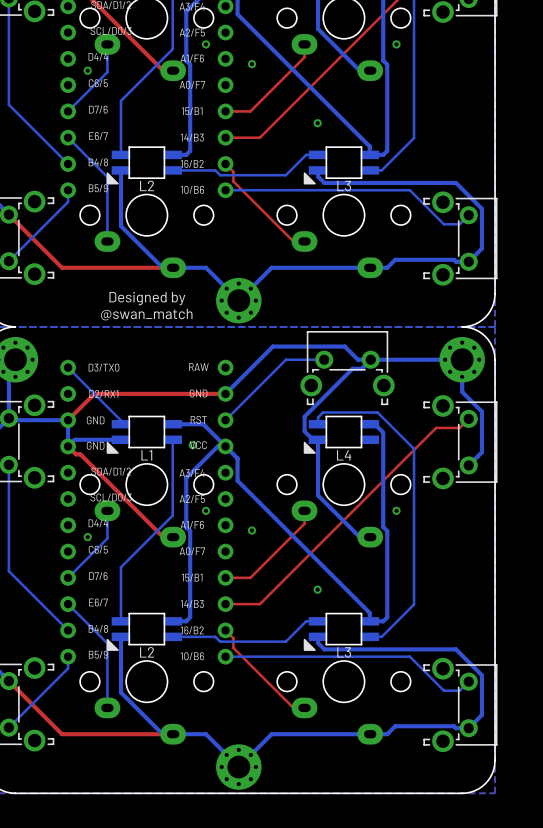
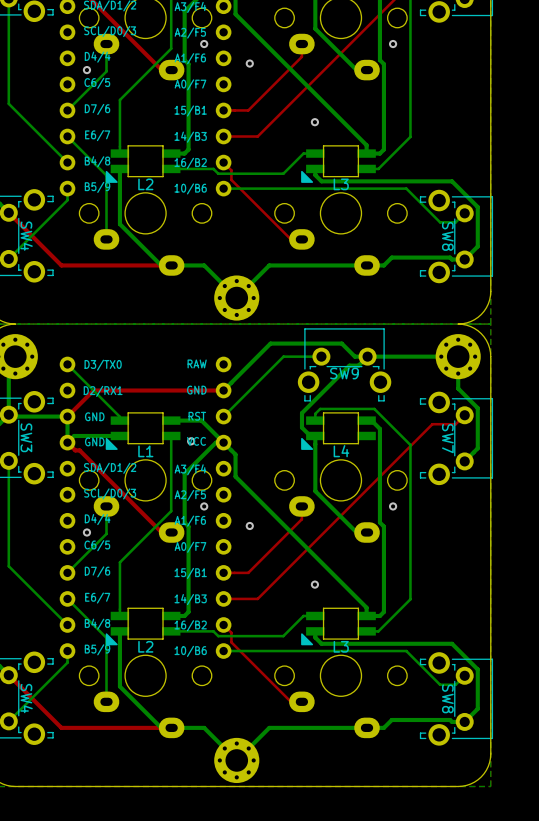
SW4 name: none -> SW4 (26, 236)
SW8 name: none -> SW8 (447, 236)
text: Designed by (147, 298) -> none
text: @swan_match (146, 314) -> none
SW9 name: none -> SW9 (344, 373)
SW3 name: none -> SW3 (26, 437)
SW7 name: none -> SW7 (447, 438)
SW4 name: none -> SW4 (26, 698)
SW8 name: none -> SW8 (447, 698)

